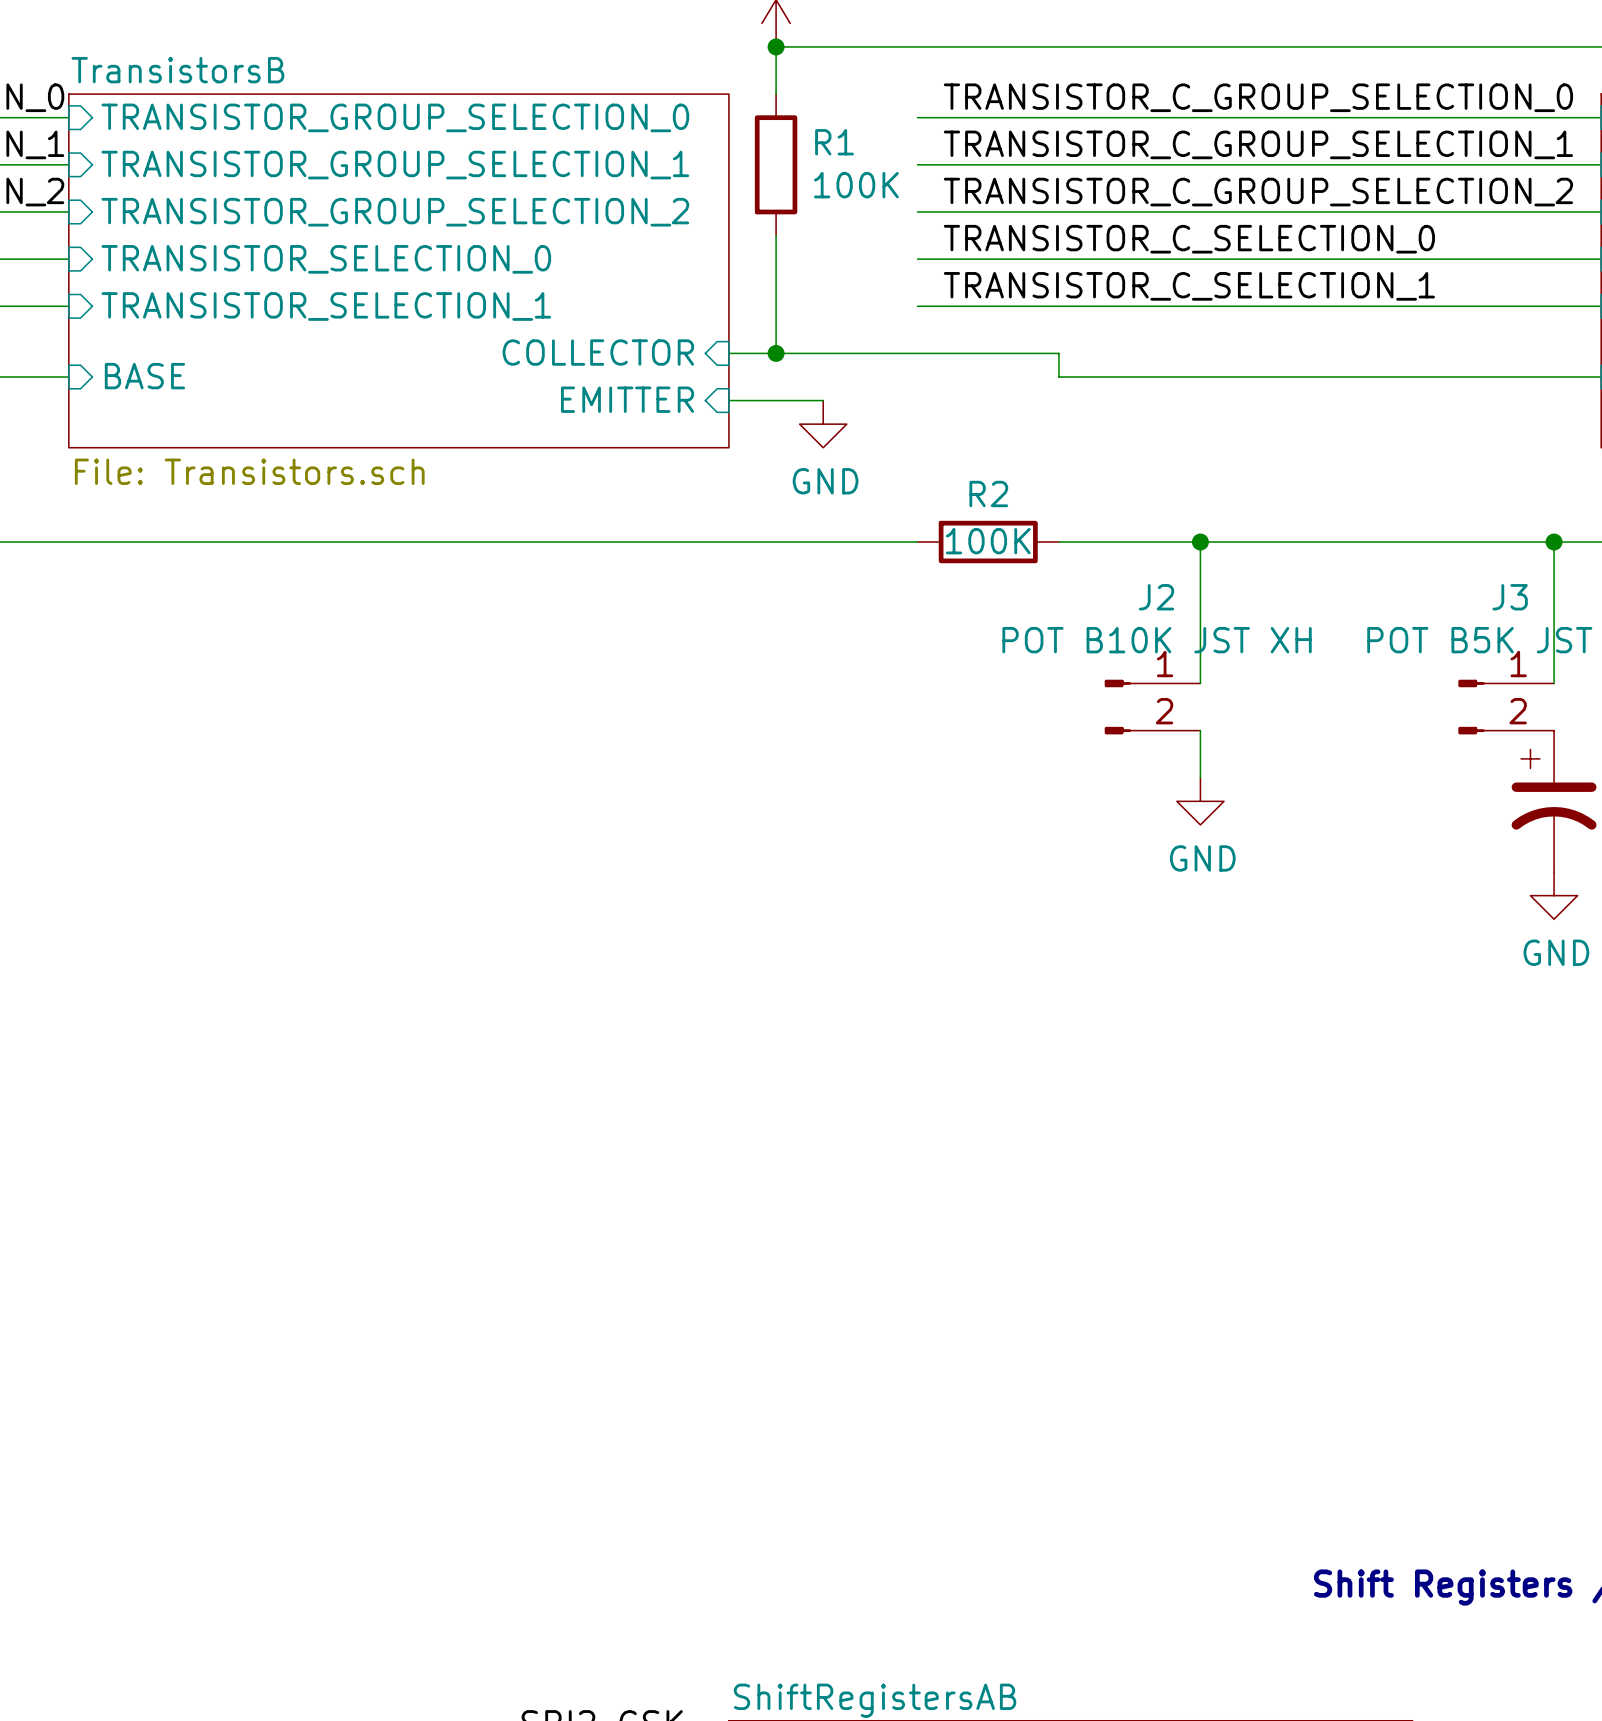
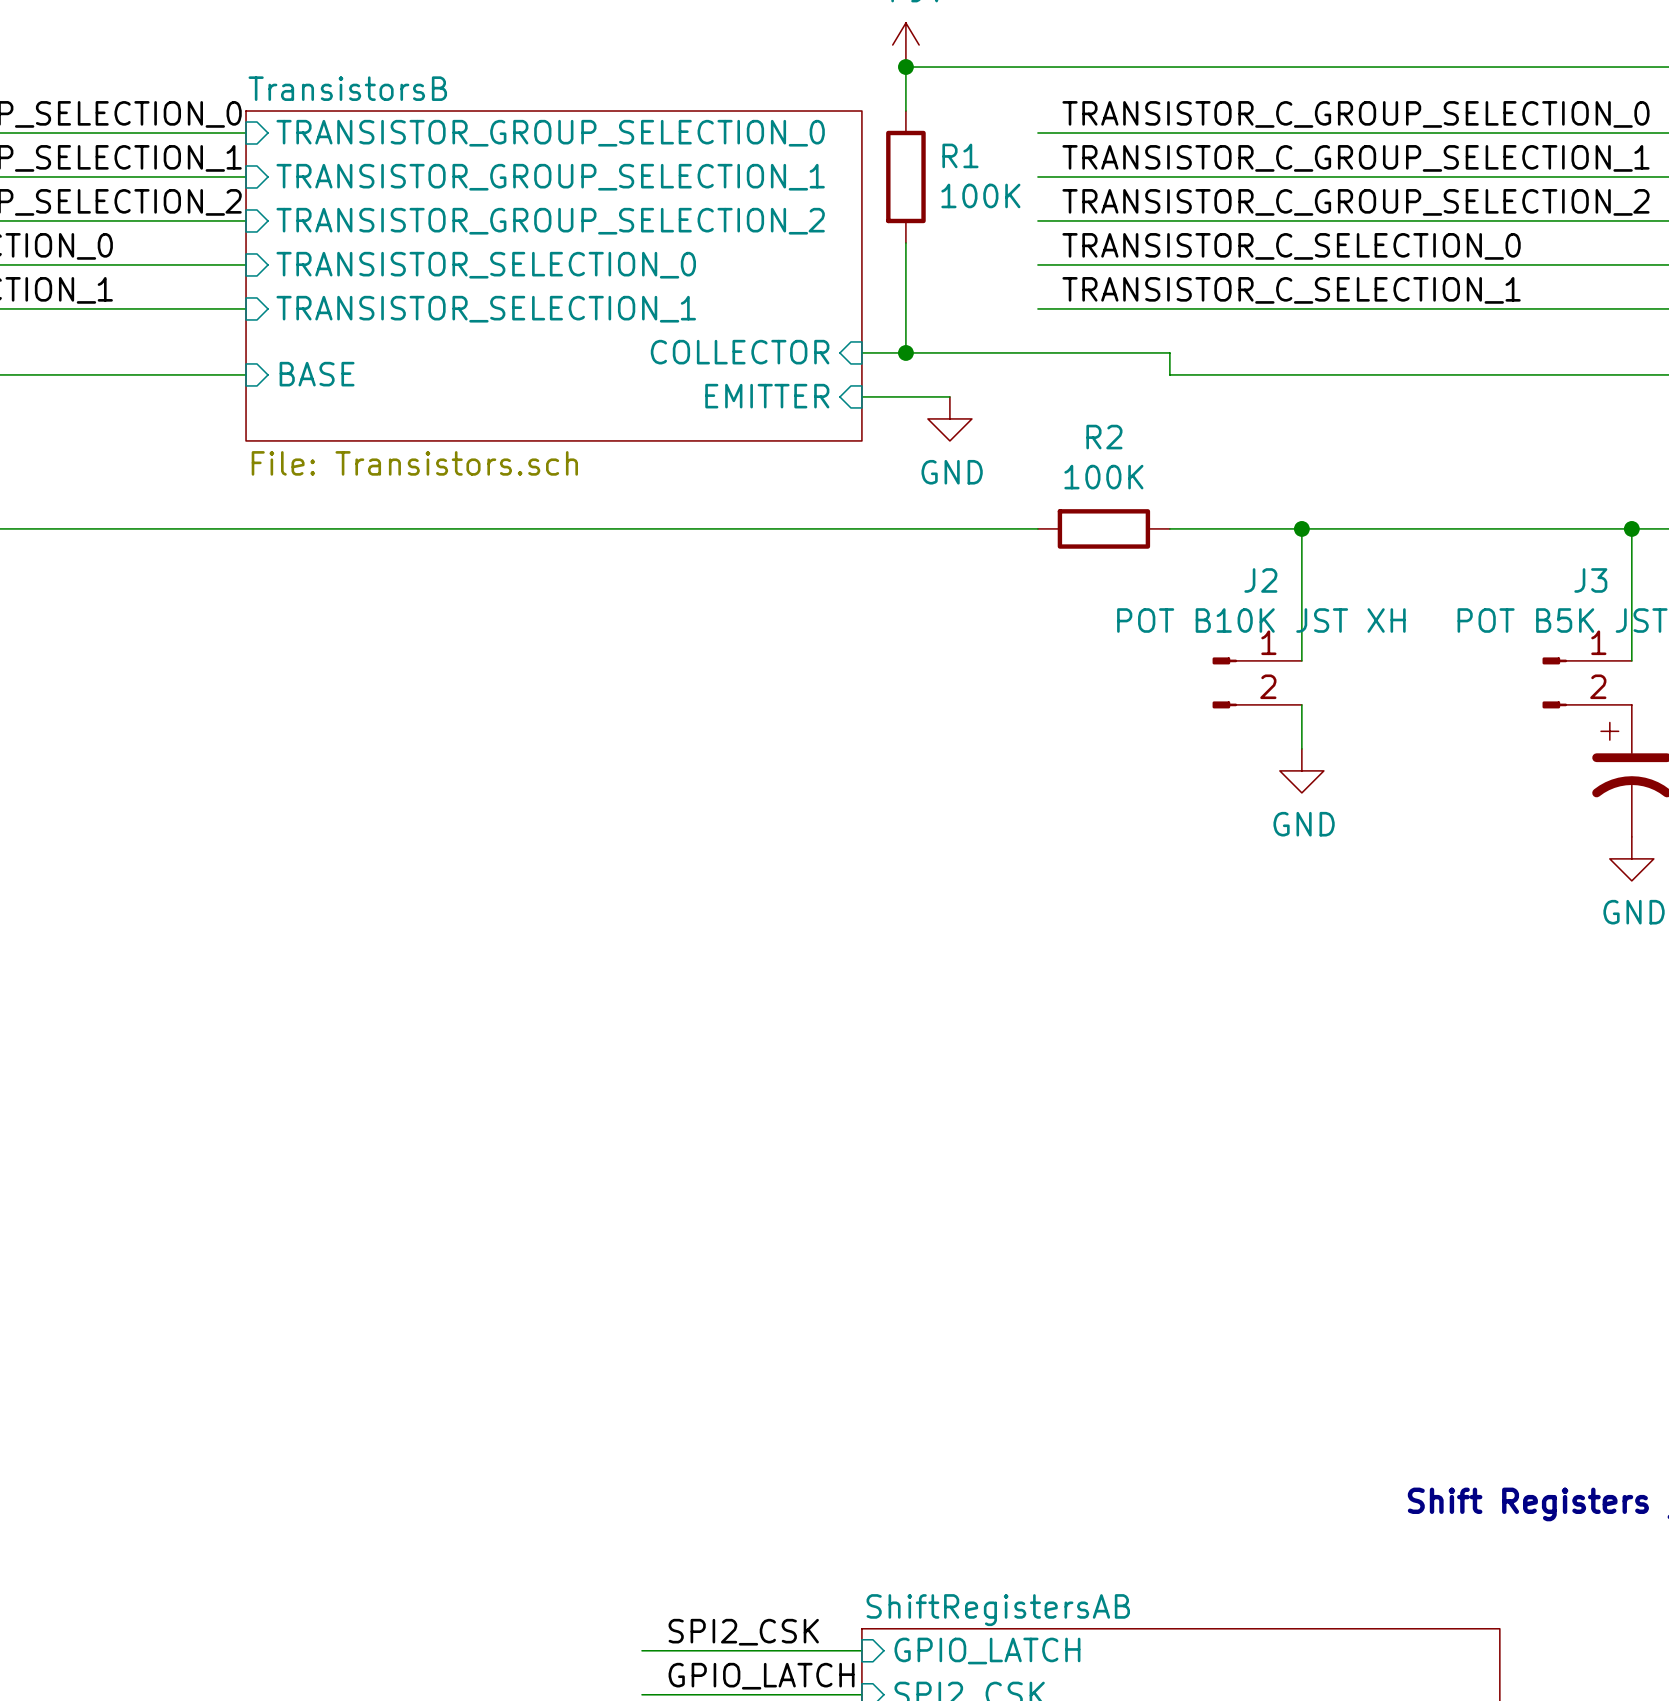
R2 name position: R2 (988, 493) -> R2 (1104, 437)
R2 value position: 100K (988, 541) -> 100K (1103, 477)

